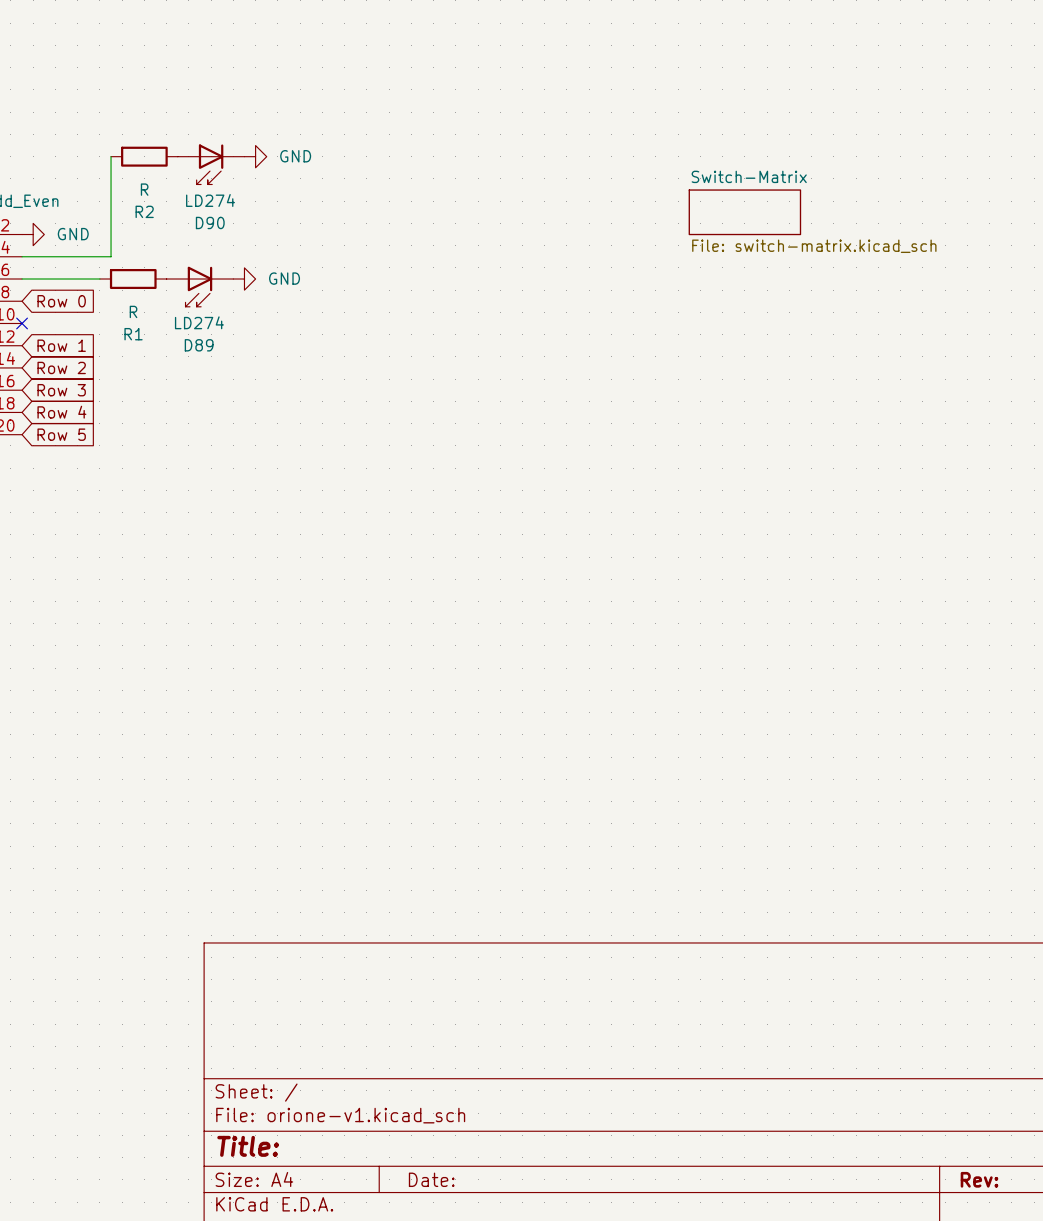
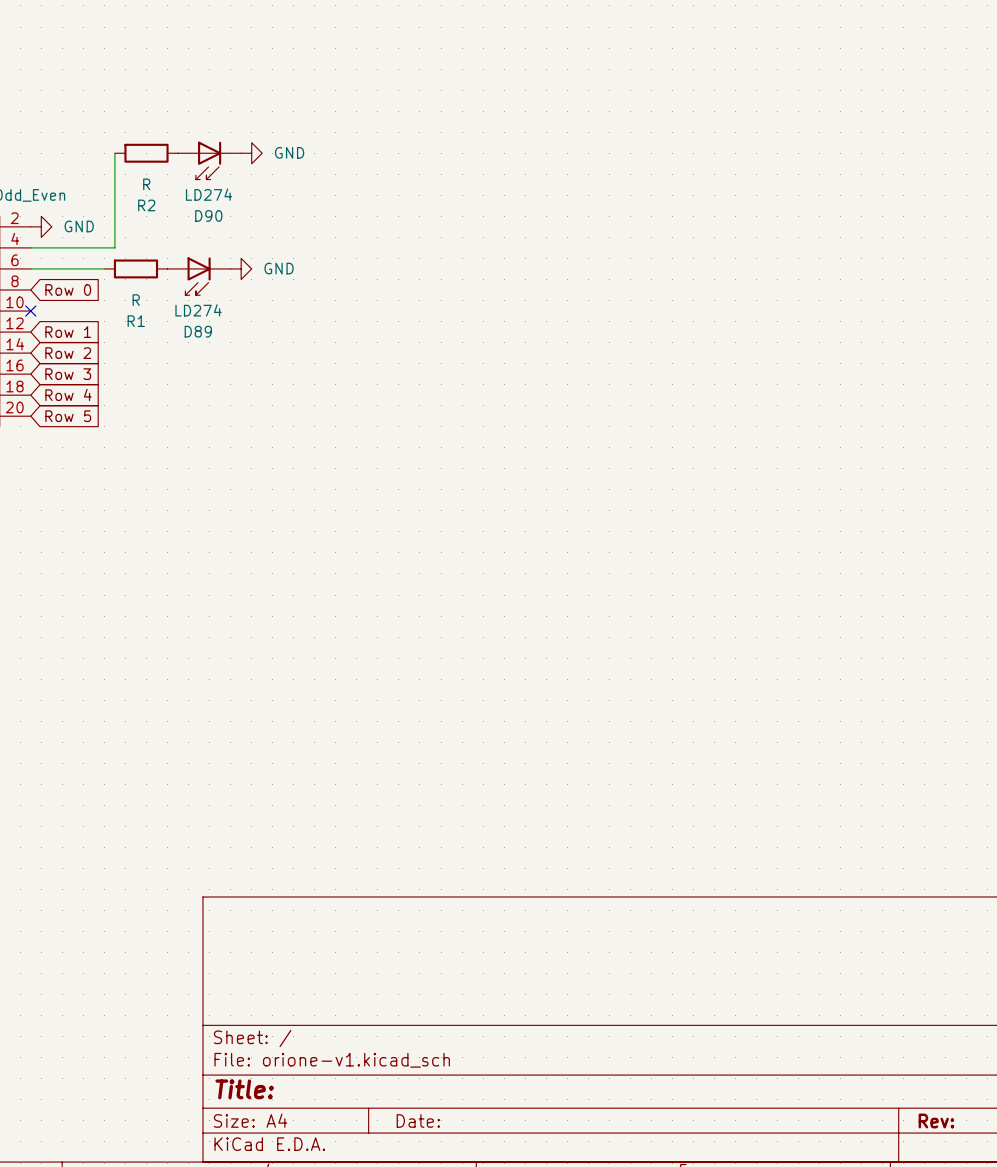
sheet Switch-Matrix: File: switch-matrix.kicad_sch (744, 212) -> none

